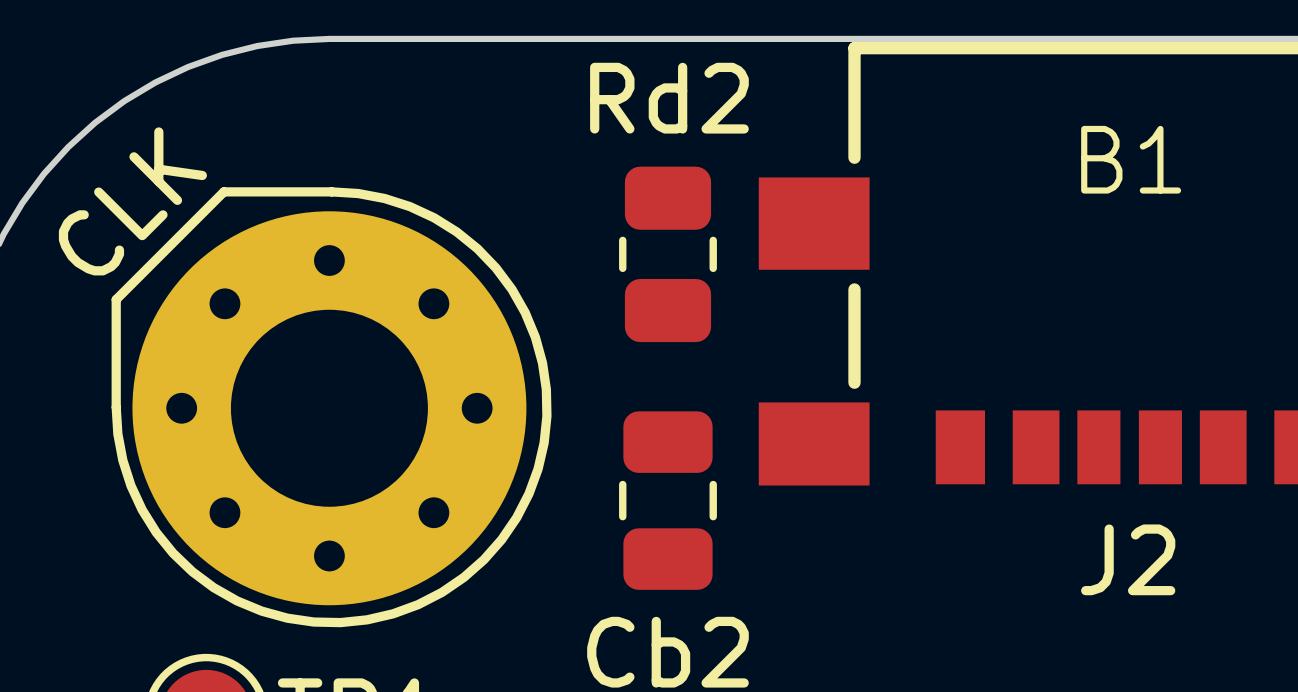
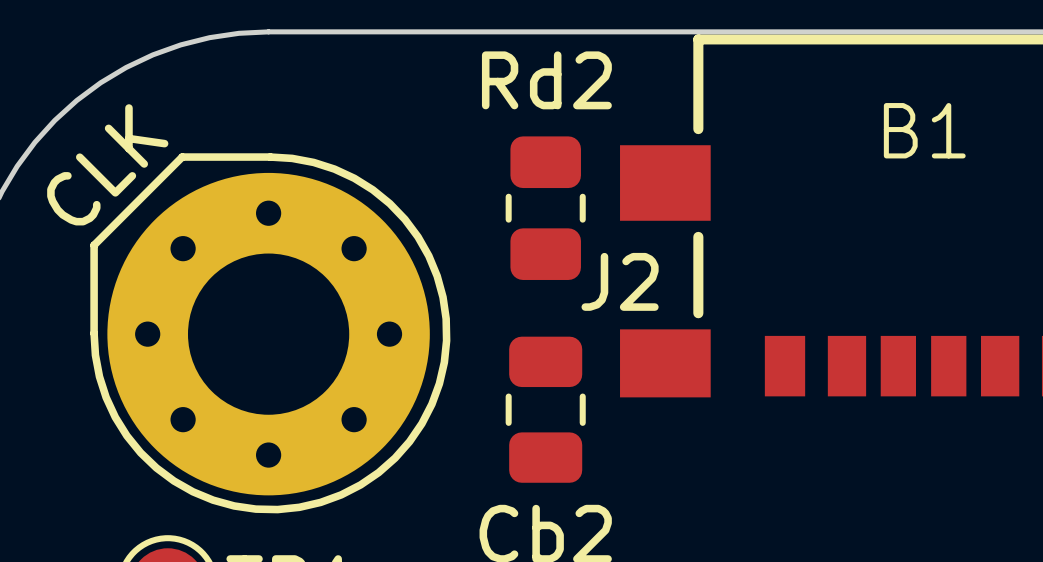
J2 name position: J2 (1128, 559) -> J2 (620, 281)

